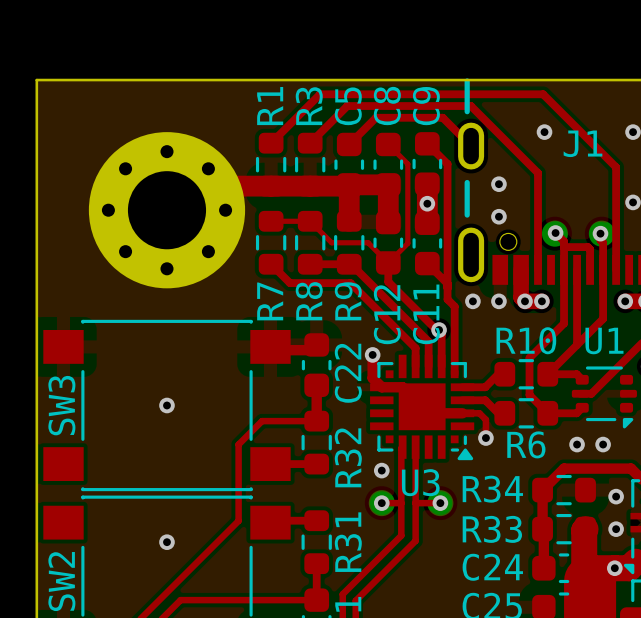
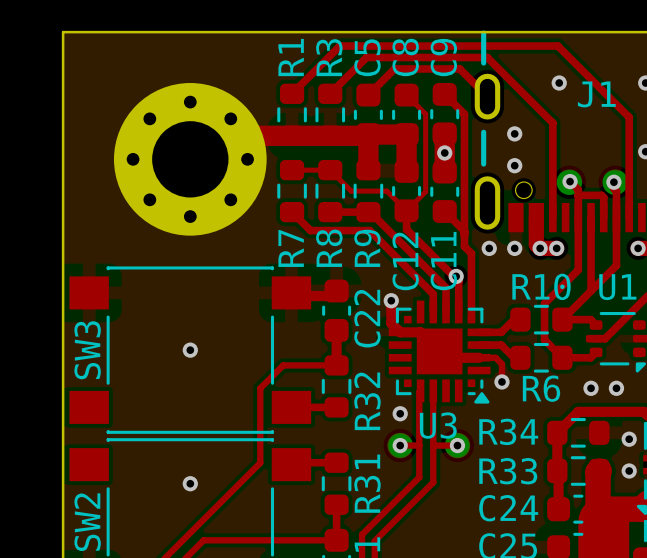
via: (614, 568) -> none

